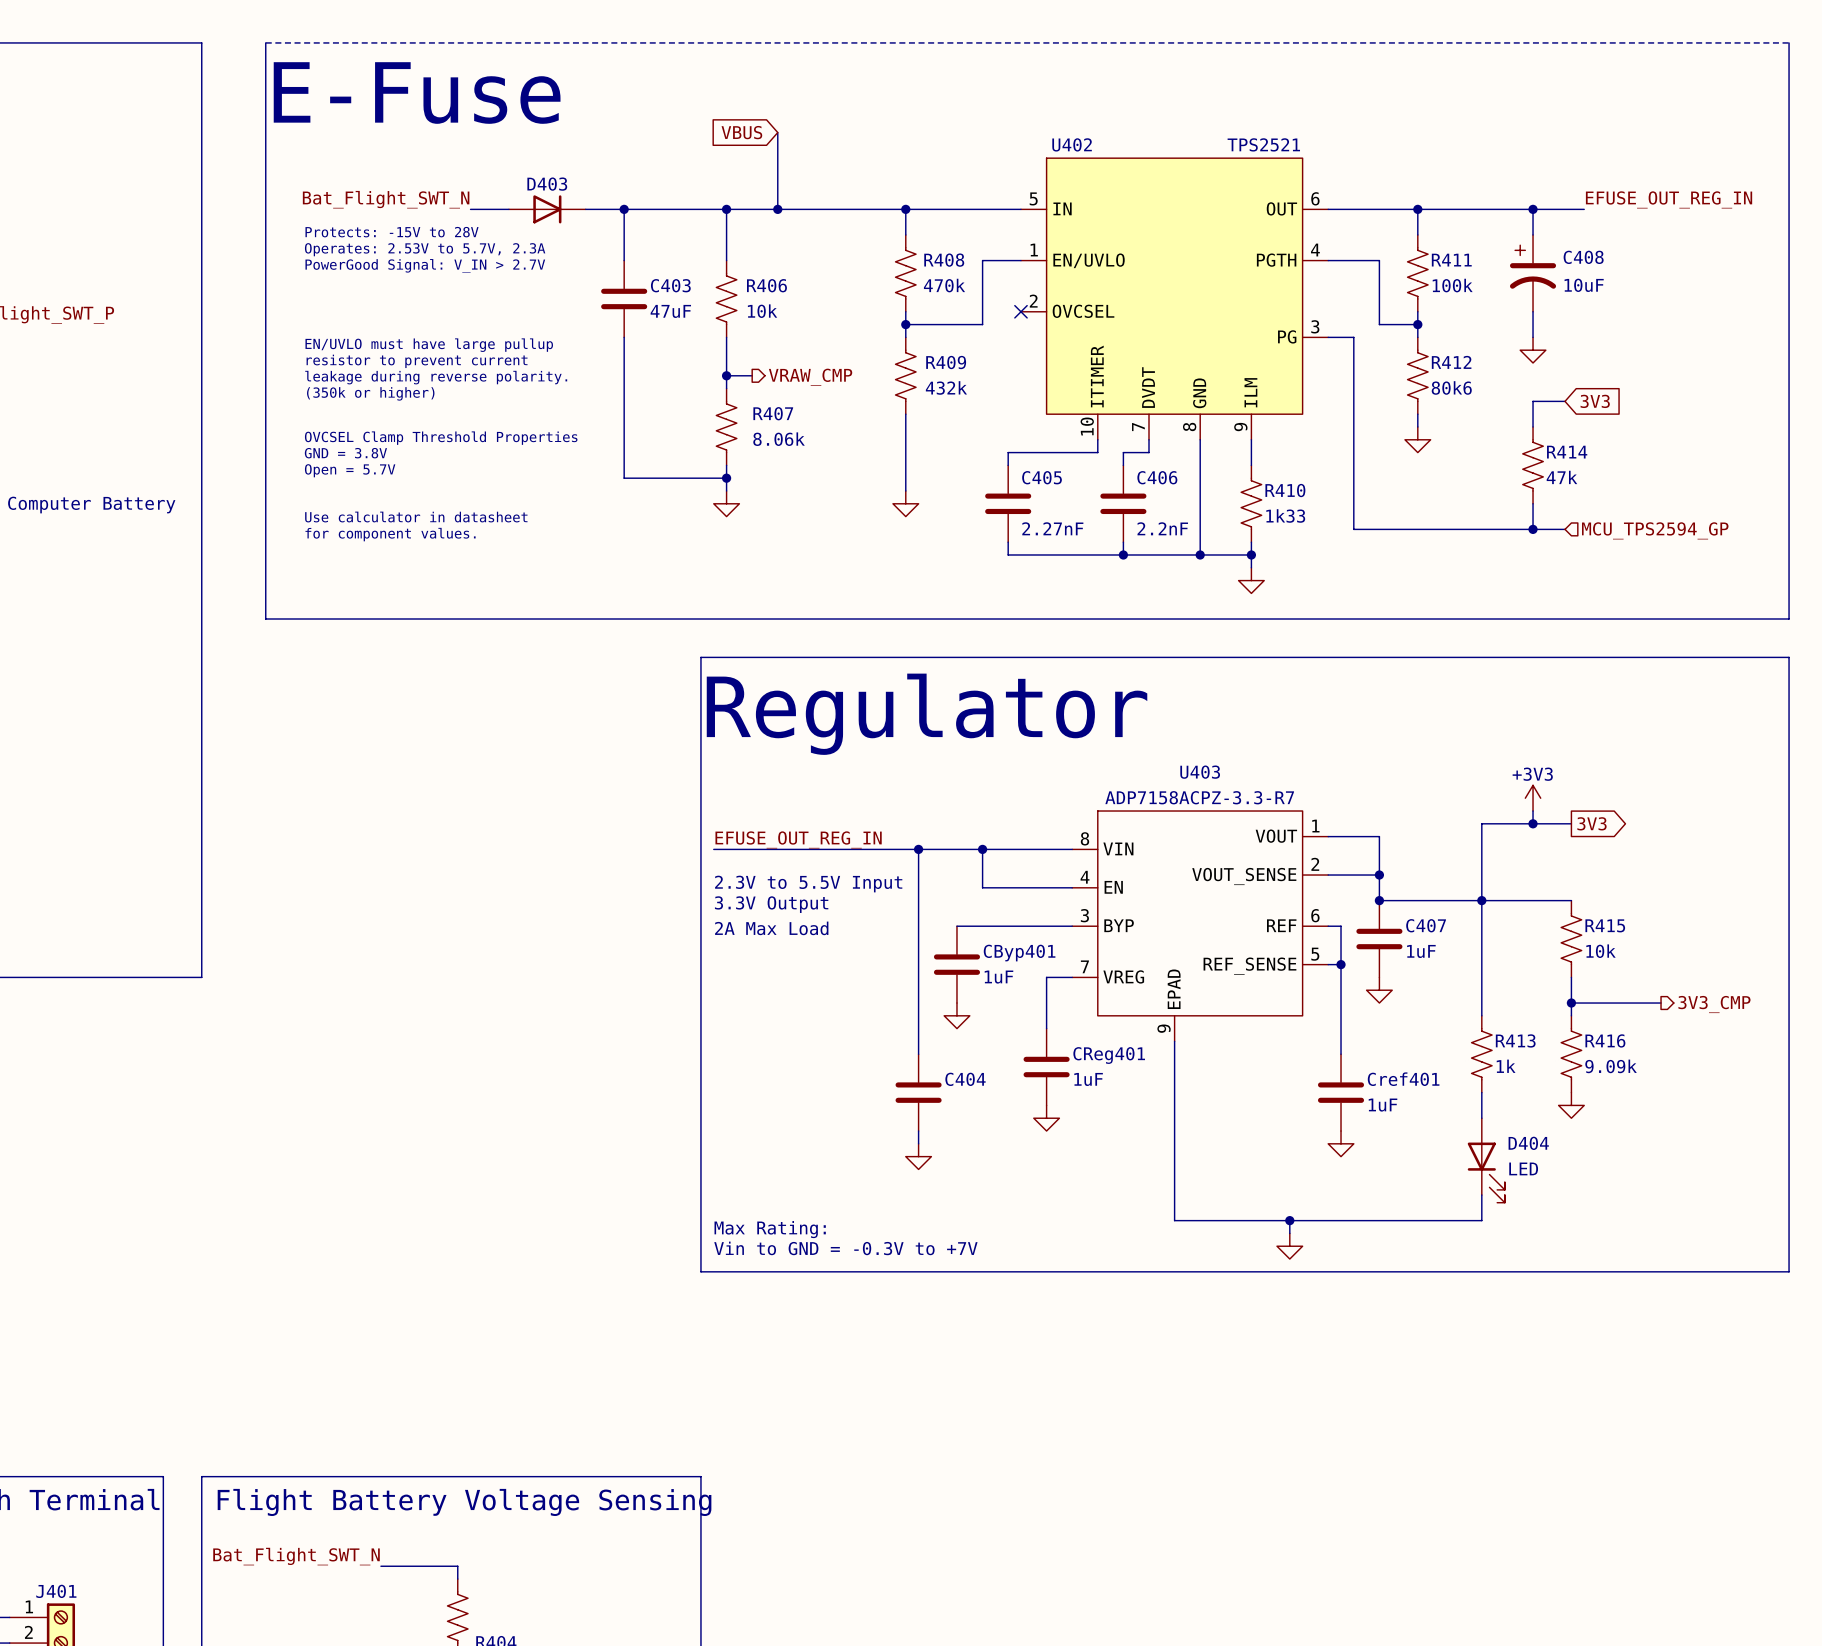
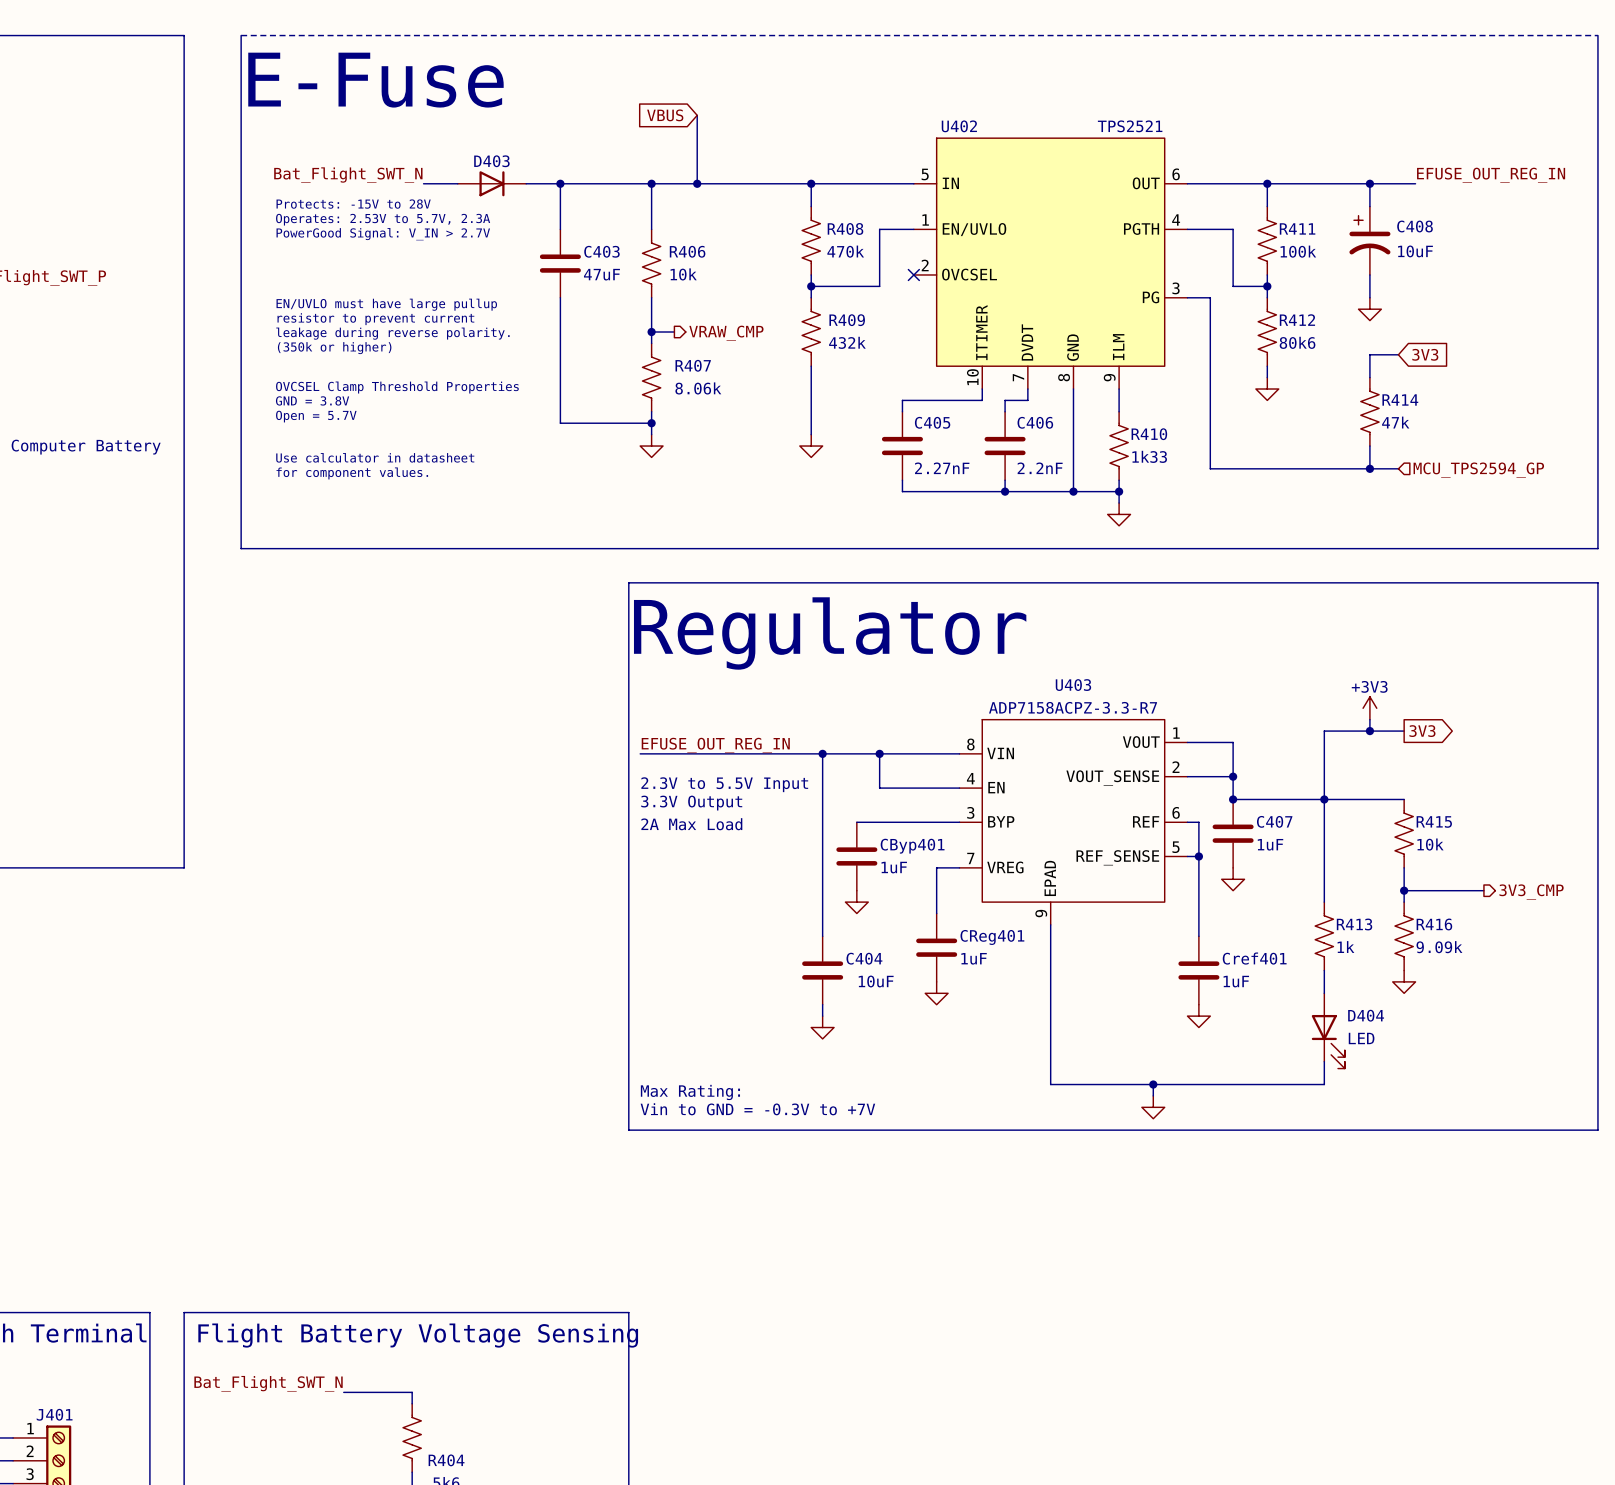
C404 value: none -> 10uF (876, 981)

